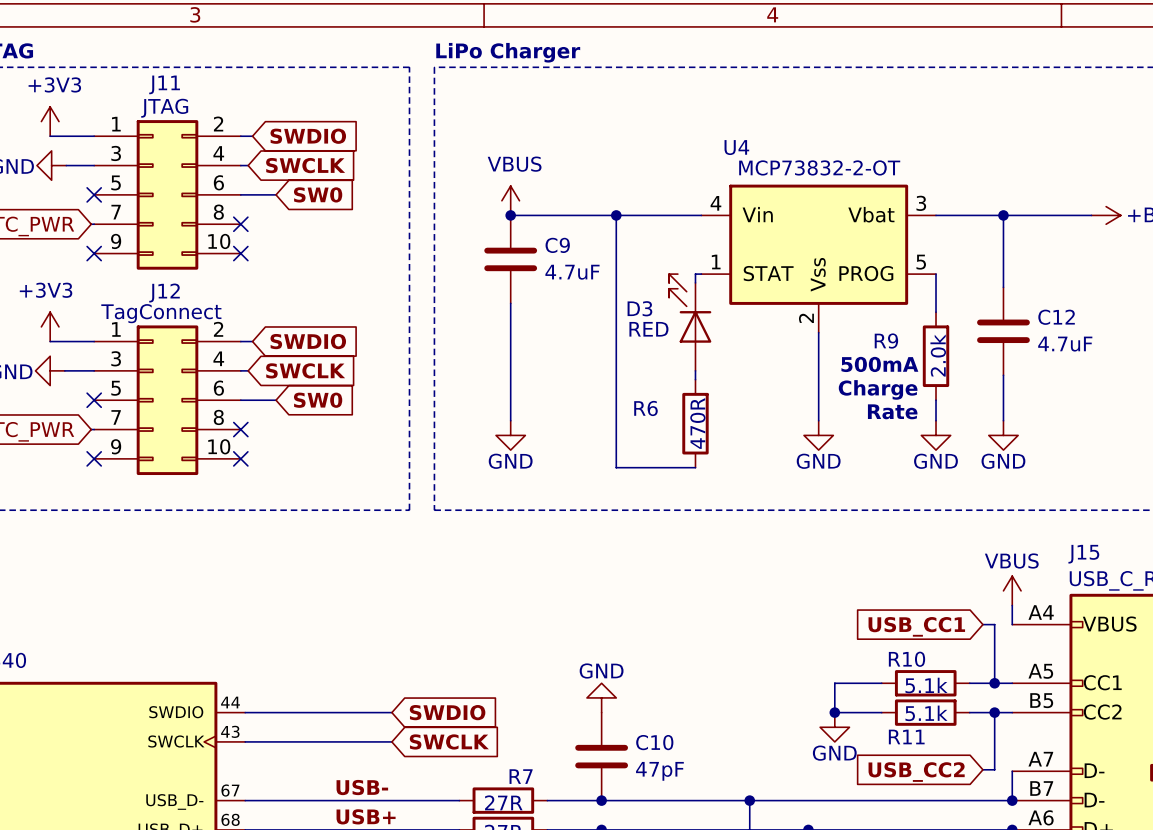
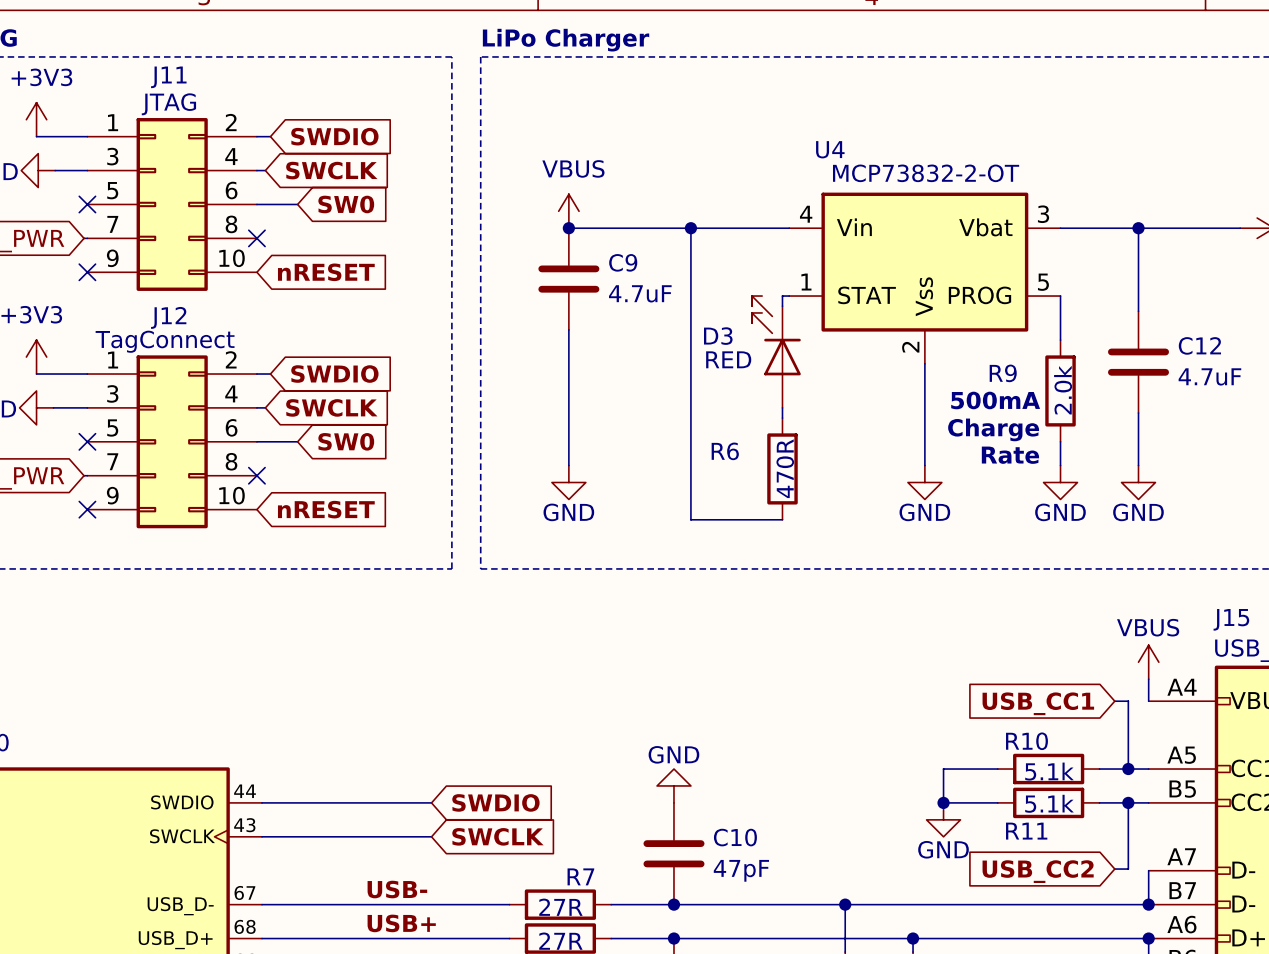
no-connect mark: (240, 253) -> none
global label: none -> nRESET (326, 272)
no-connect mark: (240, 458) -> none
global label: none -> nRESET (326, 509)

